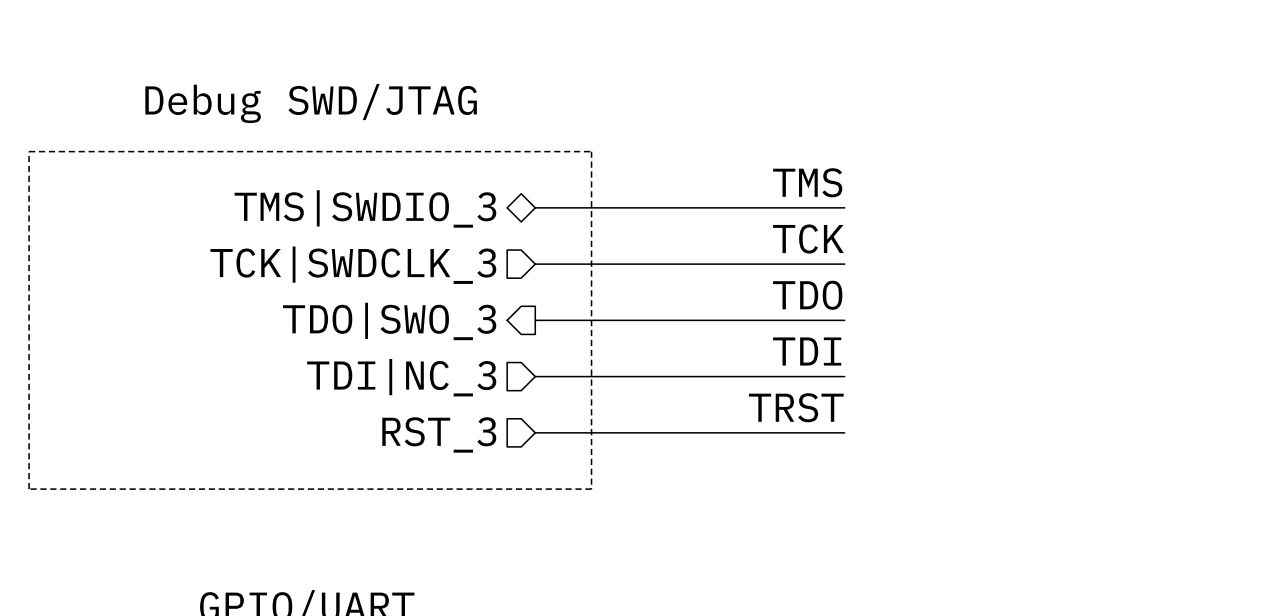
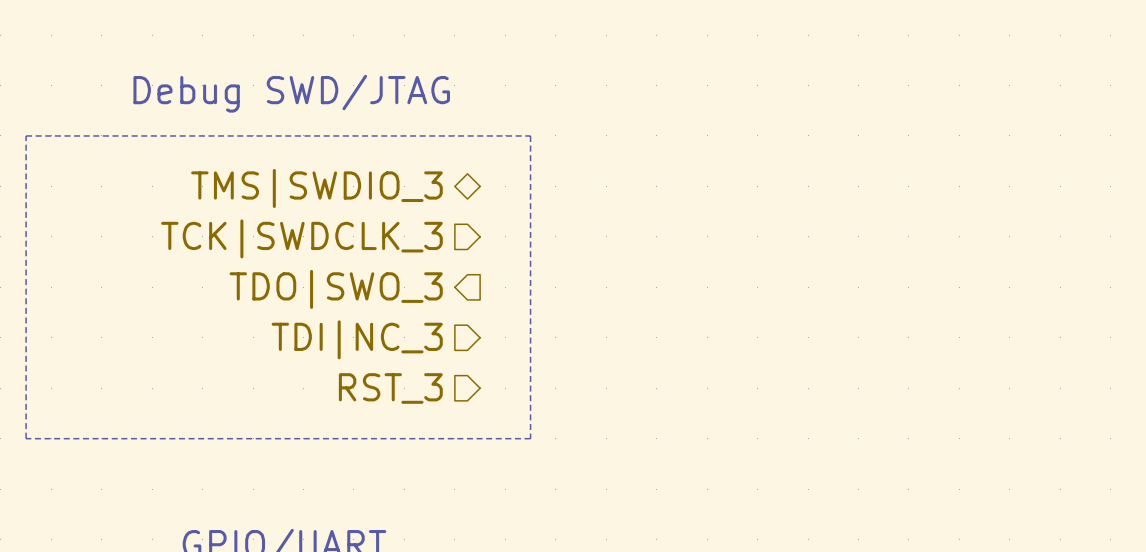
label: TMS (807, 182) -> none
wire: (535, 207) (844, 207) -> none
label: TCK (808, 239) -> none
wire: (535, 264) (844, 264) -> none
label: TDO (807, 295) -> none
wire: (535, 320) (844, 320) -> none
label: TDI (807, 351) -> none
wire: (535, 376) (844, 376) -> none
label: TRST (796, 407) -> none
wire: (535, 432) (844, 432) -> none

